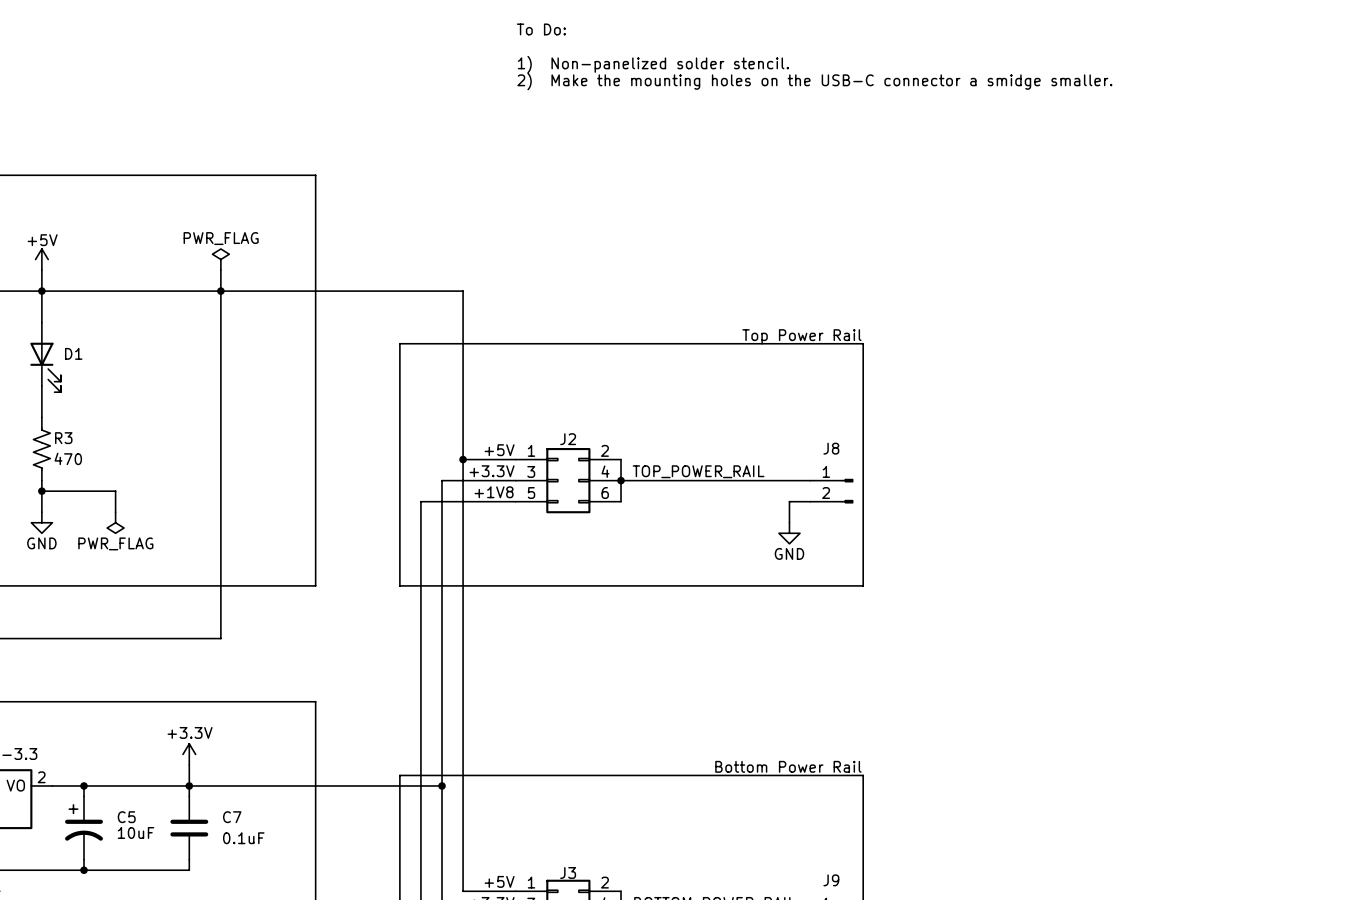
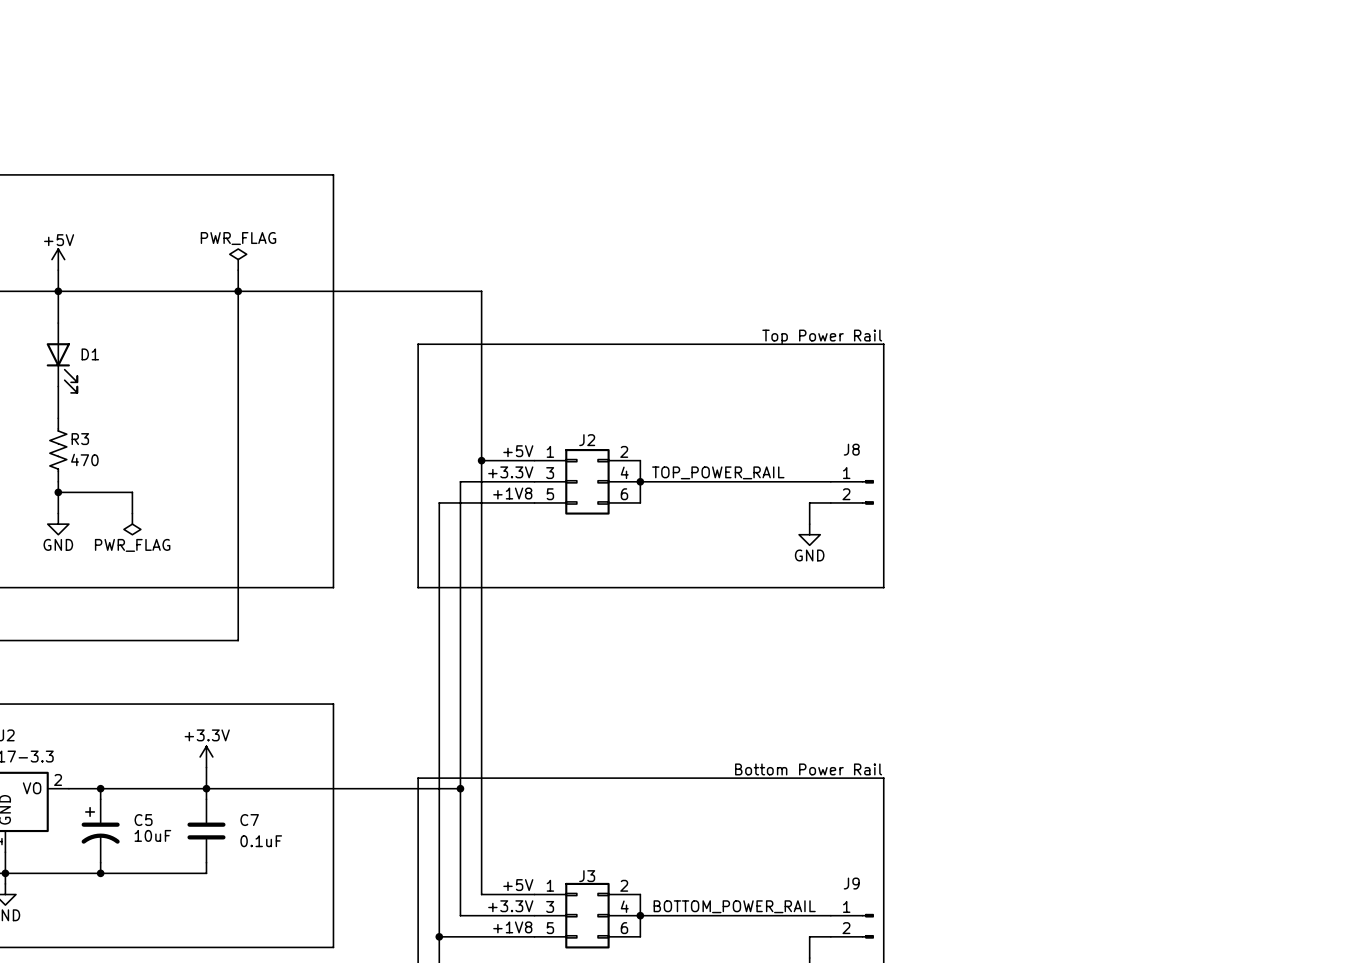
text: To Do: (541, 29) -> none
text: 1) Non-panelized solder stencil. (653, 64) -> none
text: 2) Make the mounting holes on the USB-C connector a smidge smaller. (814, 81) -> none

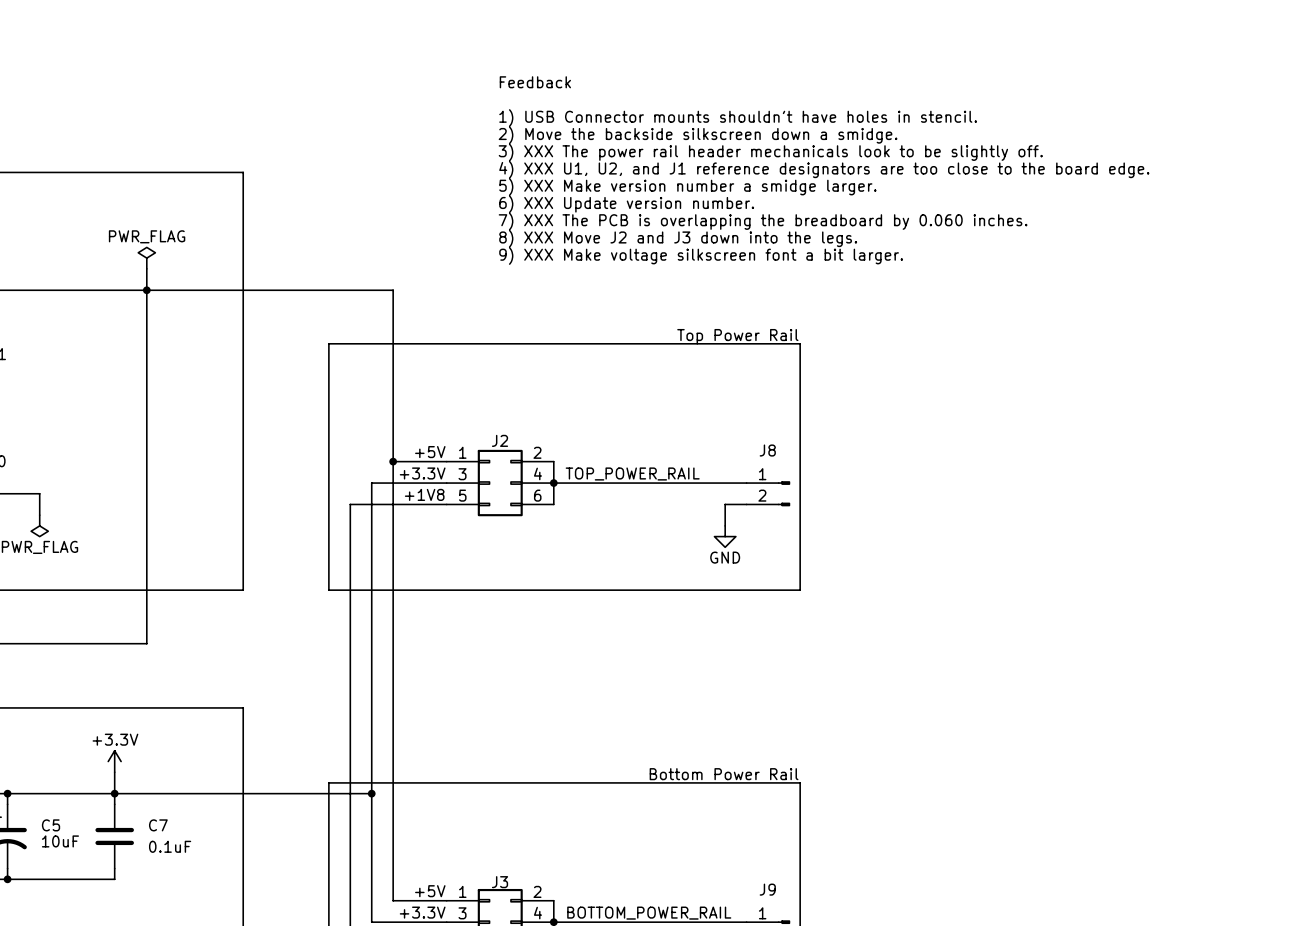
text: none -> Feedback (535, 82)
text: none -> 1) USB Connector mounts shouldn't have holes in stencil. (738, 118)
text: none -> 2) Move the backside silkscreen down a smidge. (698, 135)
text: none -> 3) XXX The power rail header mechanicals look to be slightly off. (770, 152)
text: none -> 4) XXX U1, U2, and J1 reference designators are too close to the board edge. (824, 169)
text: none -> 5) XXX Make version number a smidge larger. (687, 187)
text: none -> 6) XXX Update version number. (626, 204)
text: none -> 7) XXX The PCB is overlapping the breadboard by 0.060 inches. (763, 221)
text: none -> 8) XXX Move J2 and J3 down into the legs. (678, 238)
text: none -> 9) XXX Make voltage silkscreen font a bit larger. (701, 255)

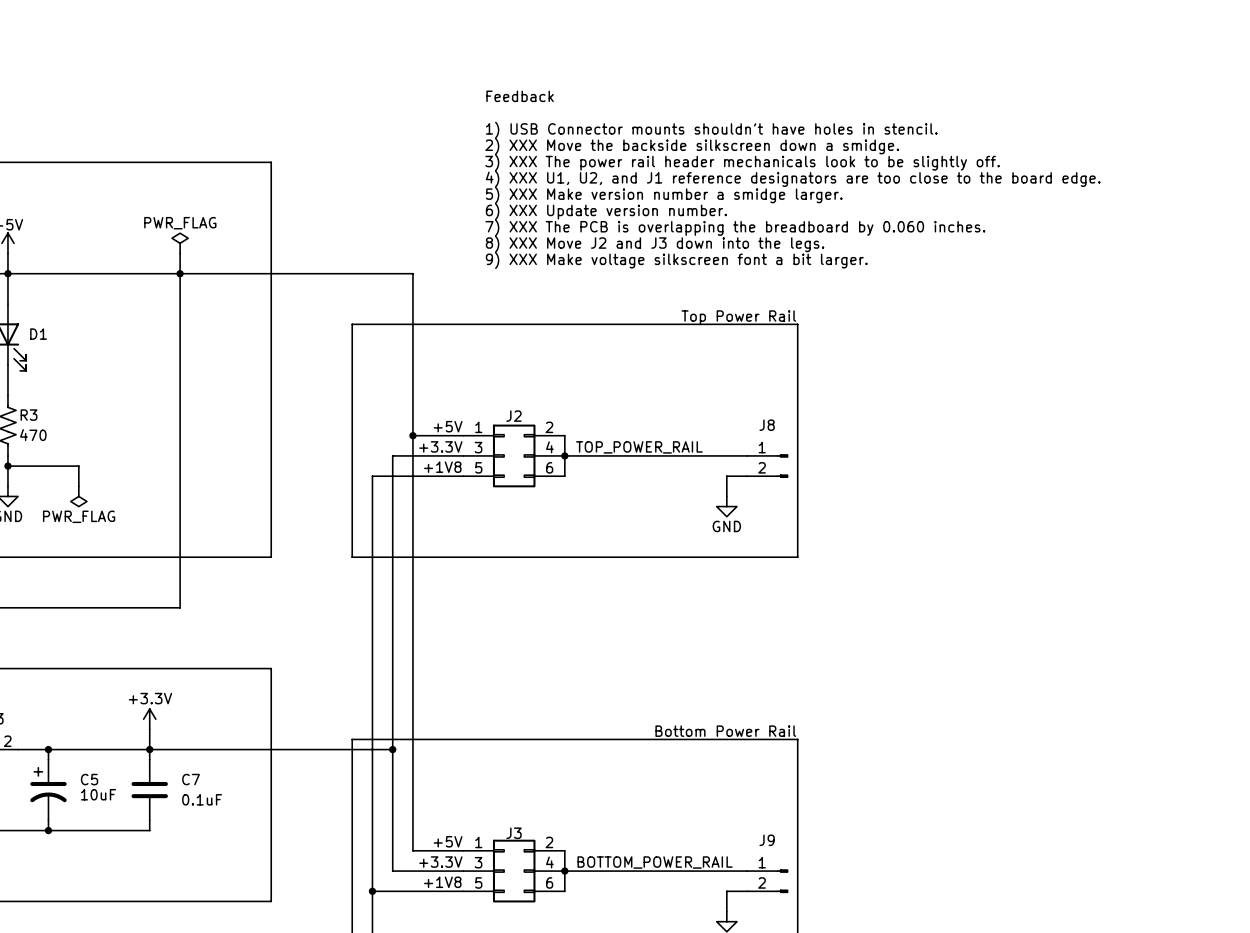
text position: Feedback (535, 82) -> Feedback (520, 96)
text position: 1) USB Connector mounts shouldn't have holes in stencil. (738, 118) -> 1) USB Connector mounts shouldn't have holes in stencil. (711, 130)
text: 2) Move the backside silkscreen down a smidge. (698, 135) -> 2) XXX Move the backside silkscreen down a smidge. (692, 146)
text position: 3) XXX The power rail header mechanicals look to be slightly off. (770, 152) -> 3) XXX The power rail header mechanicals look to be slightly off. (742, 162)
text position: 4) XXX U1, U2, and J1 reference designators are too close to the board edge. (824, 169) -> 4) XXX U1, U2, and J1 reference designators are too close to the board edge. (793, 179)
text position: 5) XXX Make version number a smidge larger. (687, 187) -> 5) XXX Make version number a smidge larger. (664, 195)
text position: 6) XXX Update version number. (626, 204) -> 6) XXX Update version number. (606, 211)
text position: 7) XXX The PCB is overlapping the breadboard by 0.060 inches. (763, 221) -> 7) XXX The PCB is overlapping the breadboard by 0.060 inches. (735, 227)
text position: 8) XXX Move J2 and J3 down into the legs. (678, 238) -> 8) XXX Move J2 and J3 down into the legs. (655, 244)
text position: 9) XXX Make voltage silkscreen font a bit larger. (701, 255) -> 9) XXX Make voltage silkscreen font a bit larger. (676, 260)

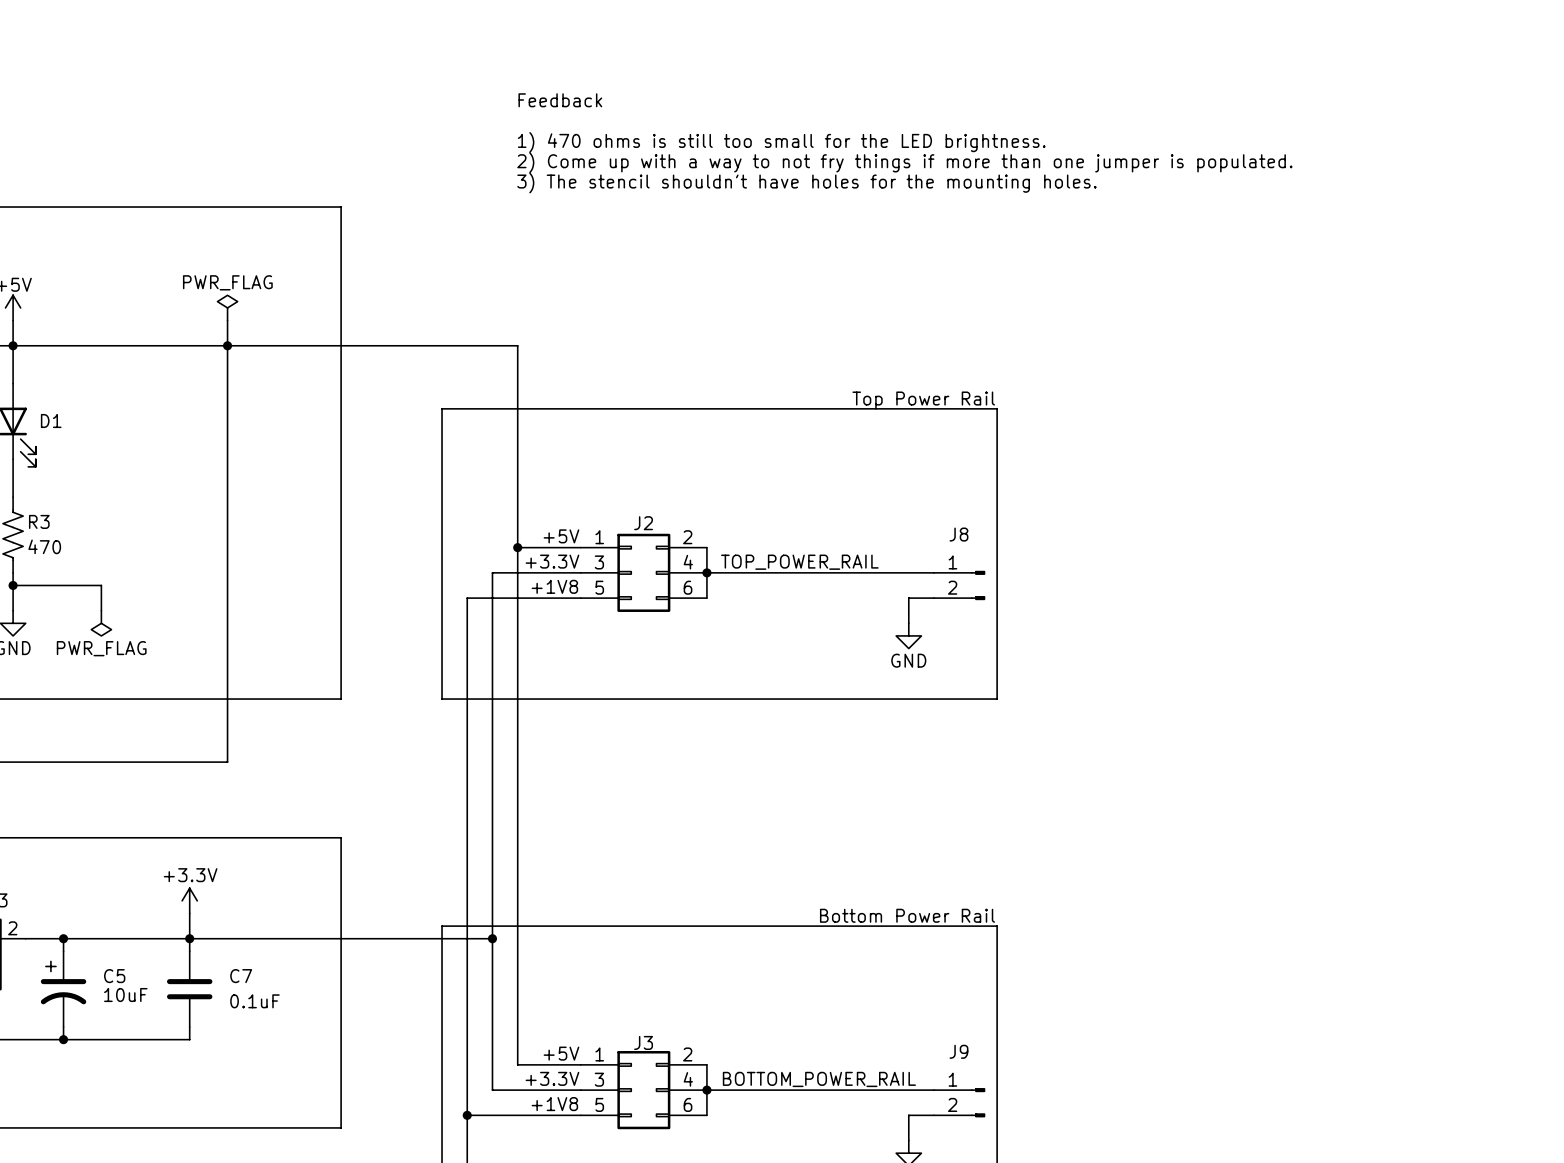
text position: Feedback (520, 96) -> Feedback (560, 100)
text: none -> 1) 470 ohms is still too small for the LED brightness. (781, 142)
text: none -> 2) Come up with a way to not fry things if more than one jumper is populated. (904, 162)
text: 1) USB Connector mounts shouldn't have holes in stencil. (711, 130) -> none
text: none -> 3) The stencil shouldn't have holes for the mounting holes. (806, 183)
text: 2) XXX Move the backside silkscreen down a smidge. (692, 146) -> none
text: 3) XXX The power rail header mechanicals look to be slightly off. (742, 162) -> none
text: 4) XXX U1, U2, and J1 reference designators are too close to the board edge. (793, 179) -> none
text: 5) XXX Make version number a smidge larger. (664, 195) -> none
text: 6) XXX Update version number. (606, 211) -> none
text: 7) XXX The PCB is overlapping the breadboard by 0.060 inches. (735, 227) -> none
text: 8) XXX Move J2 and J3 down into the legs. (655, 244) -> none
text: 9) XXX Make voltage silkscreen font a bit larger. (676, 260) -> none

